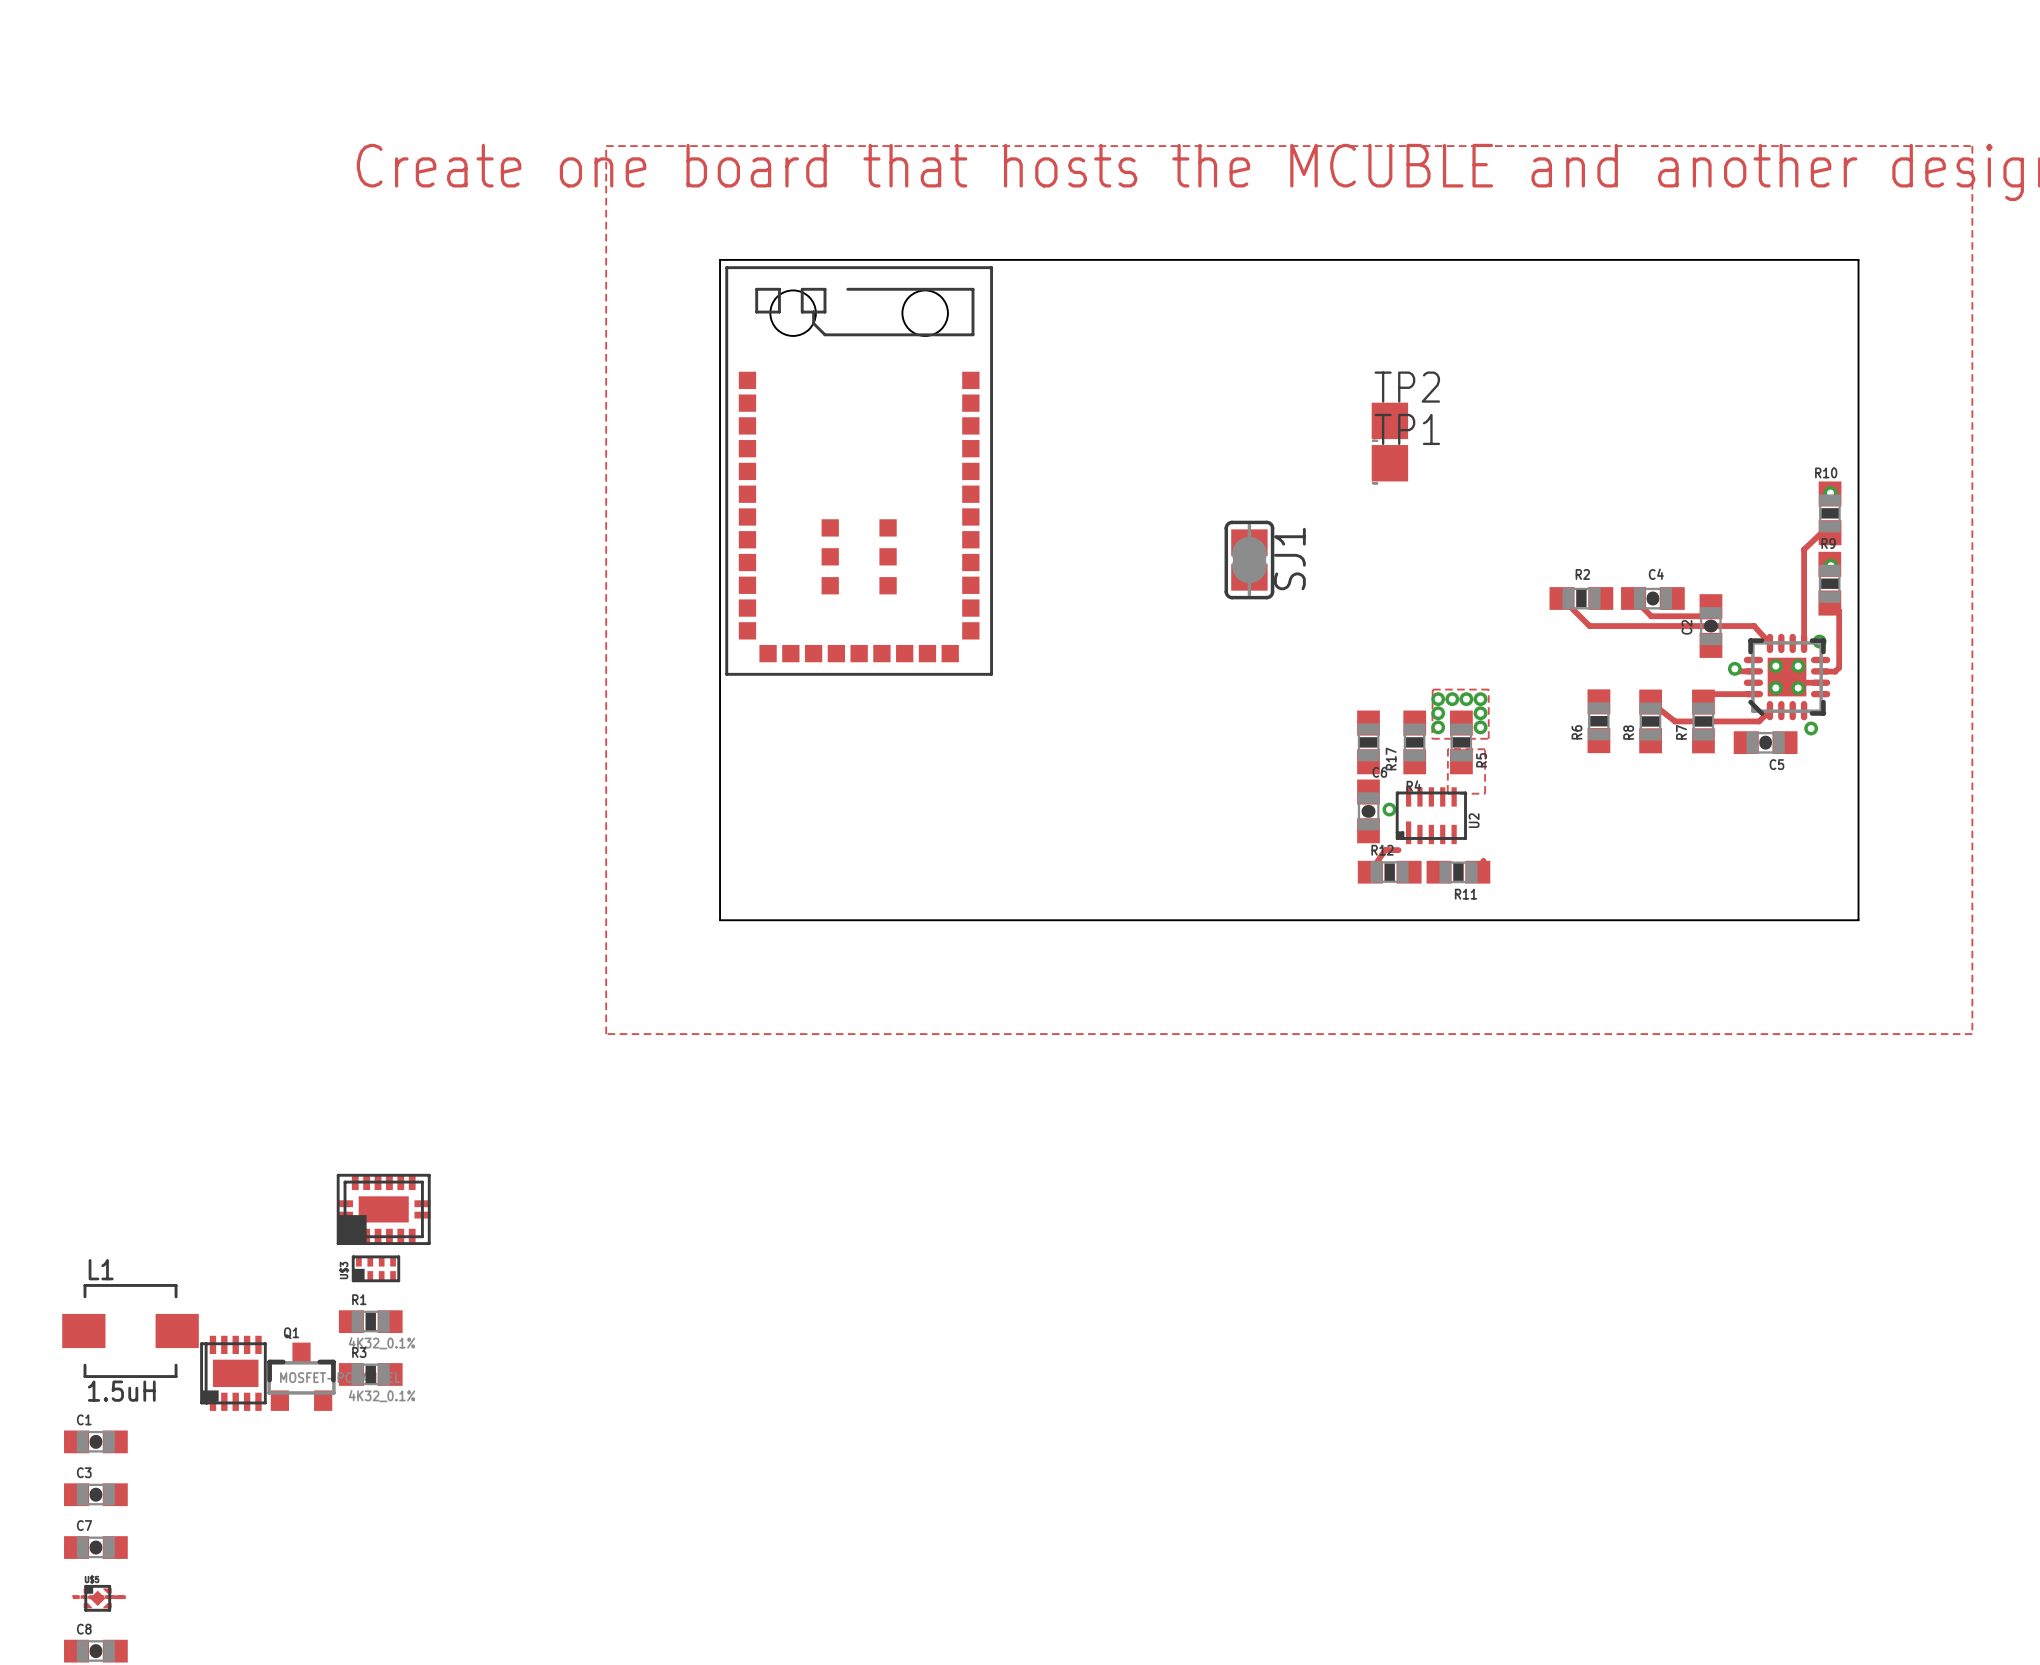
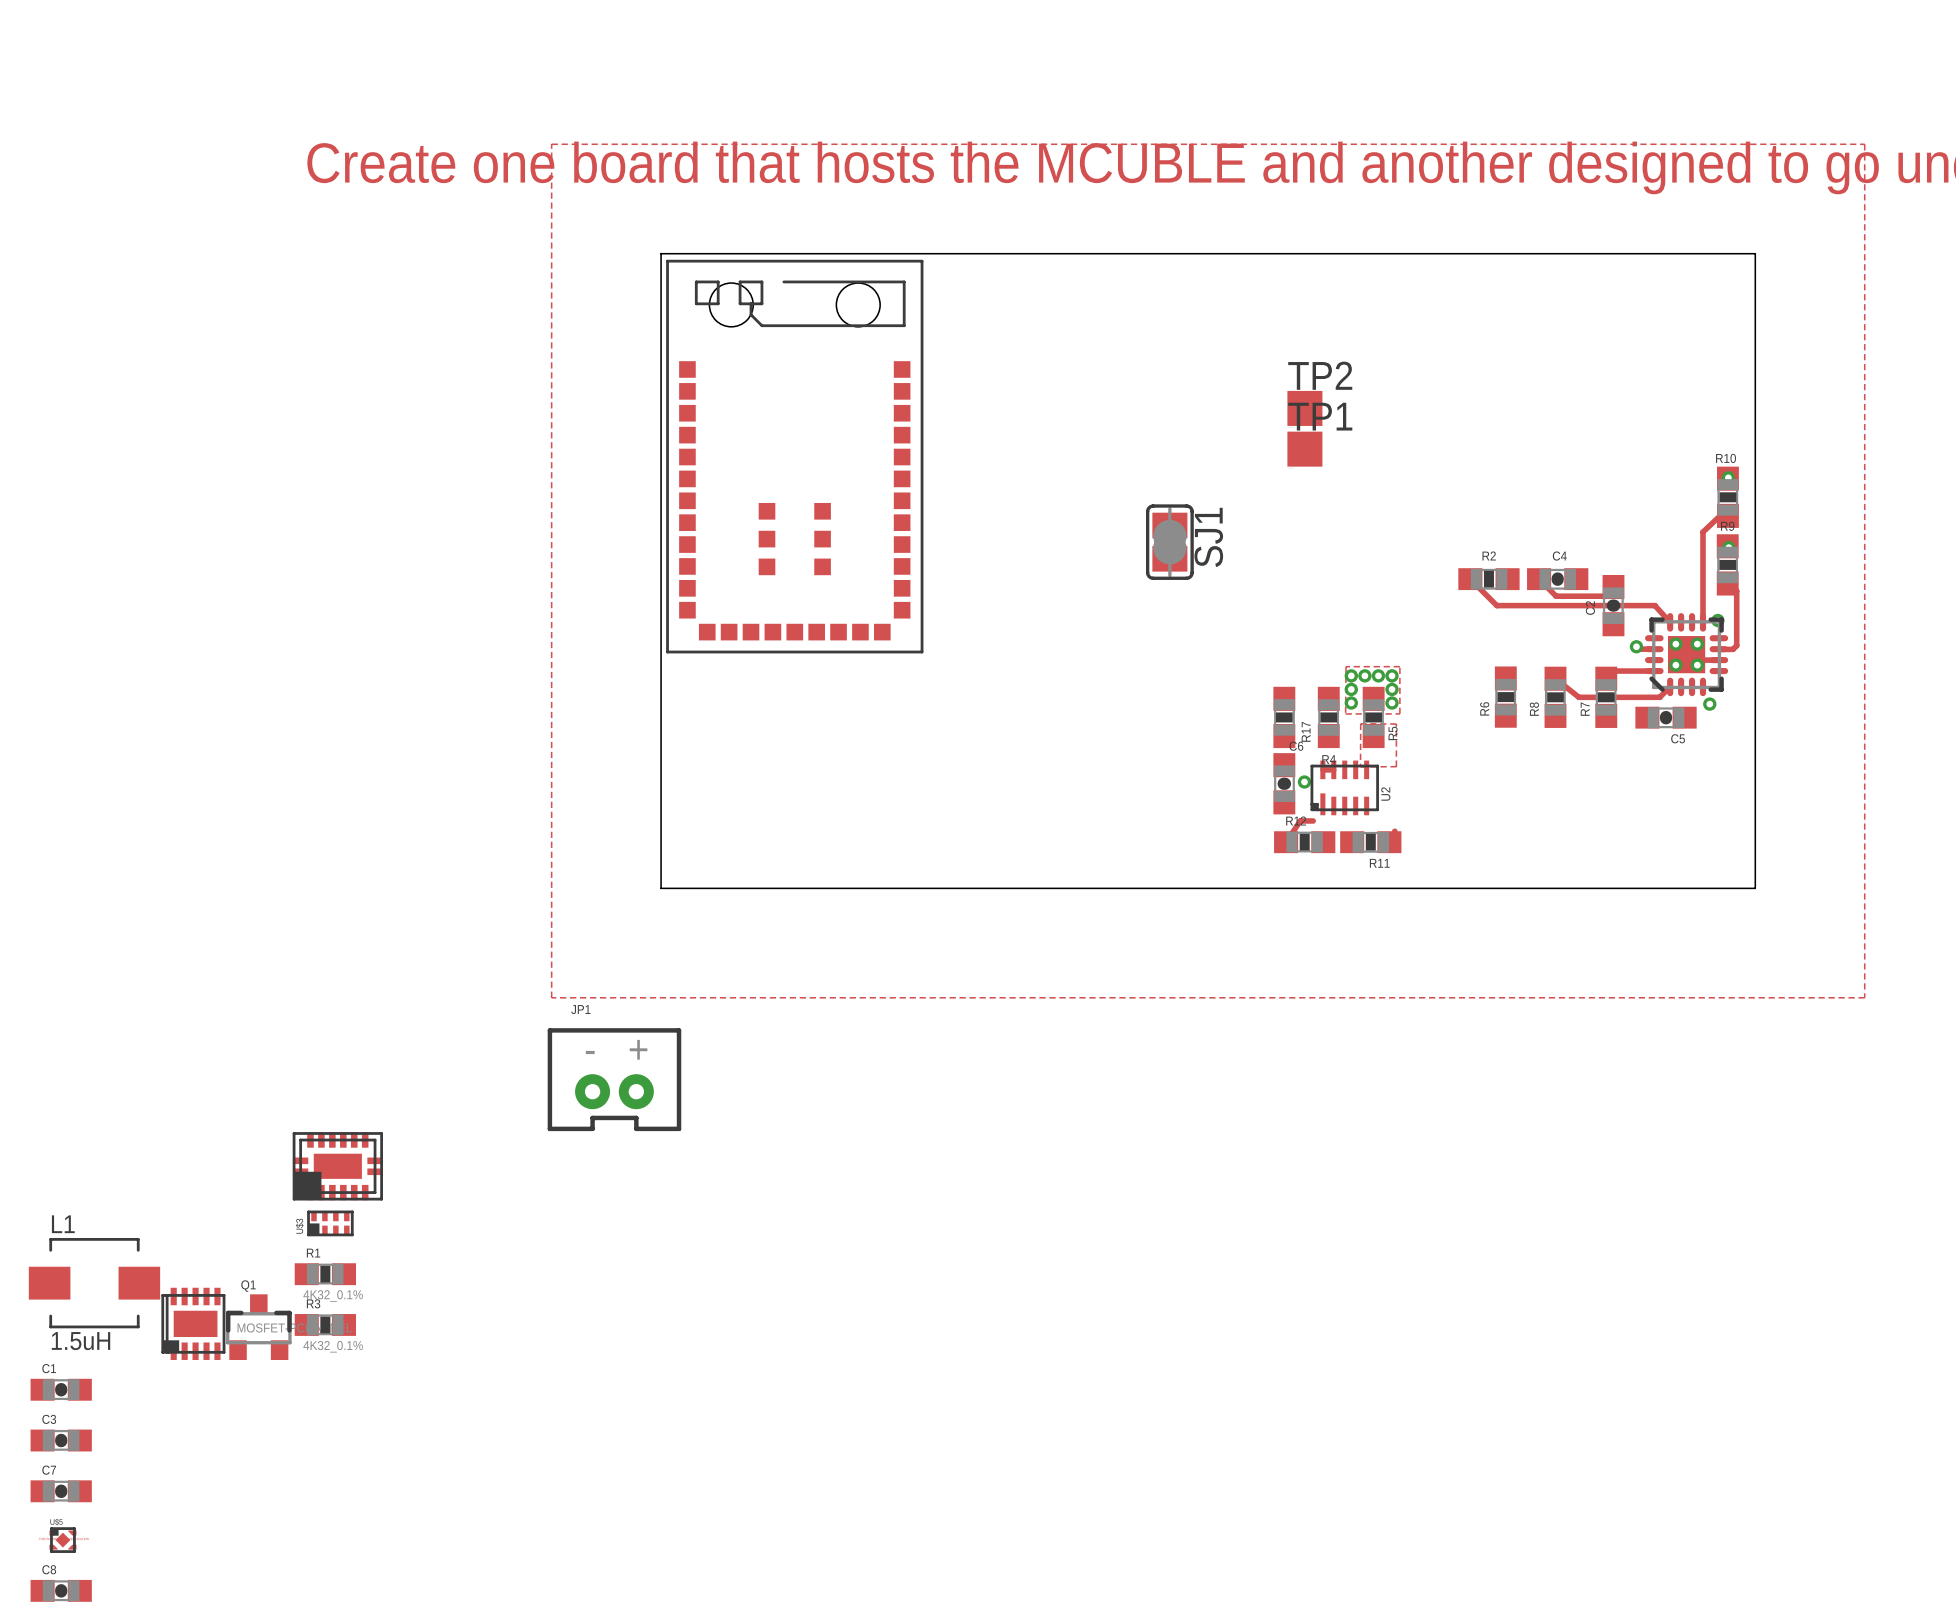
track: none -> (1322, 769) (1333, 769)
JP1: none -> (614, 1079)

